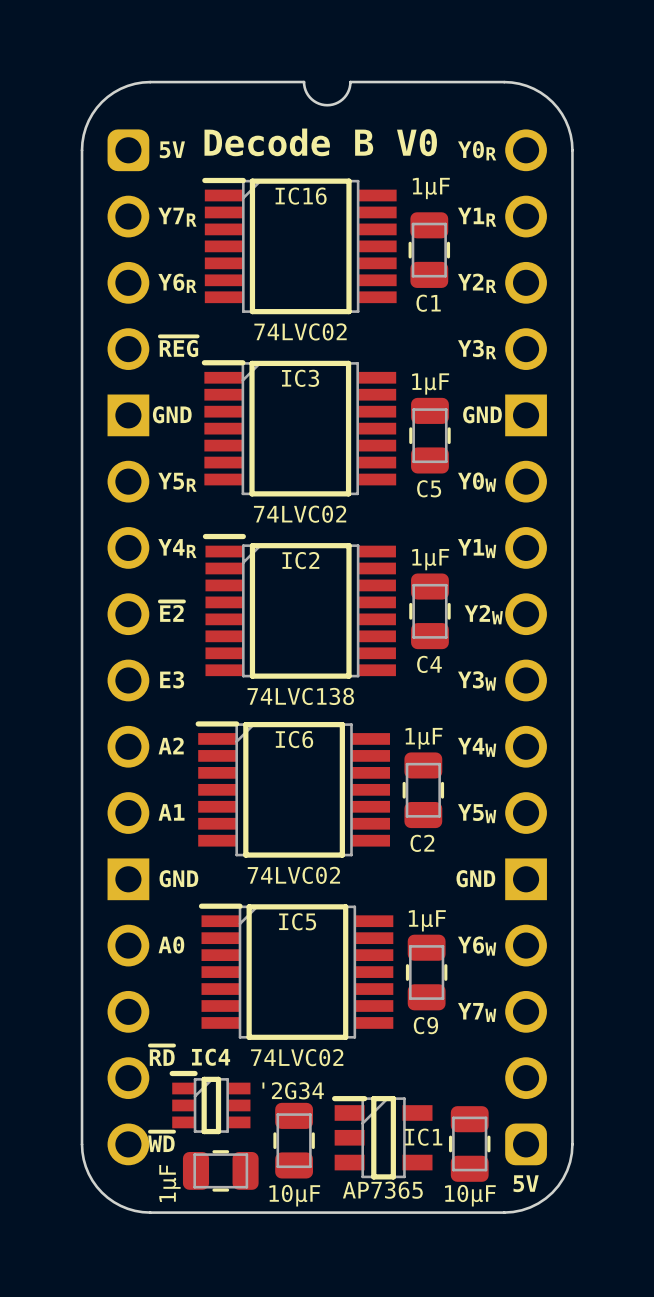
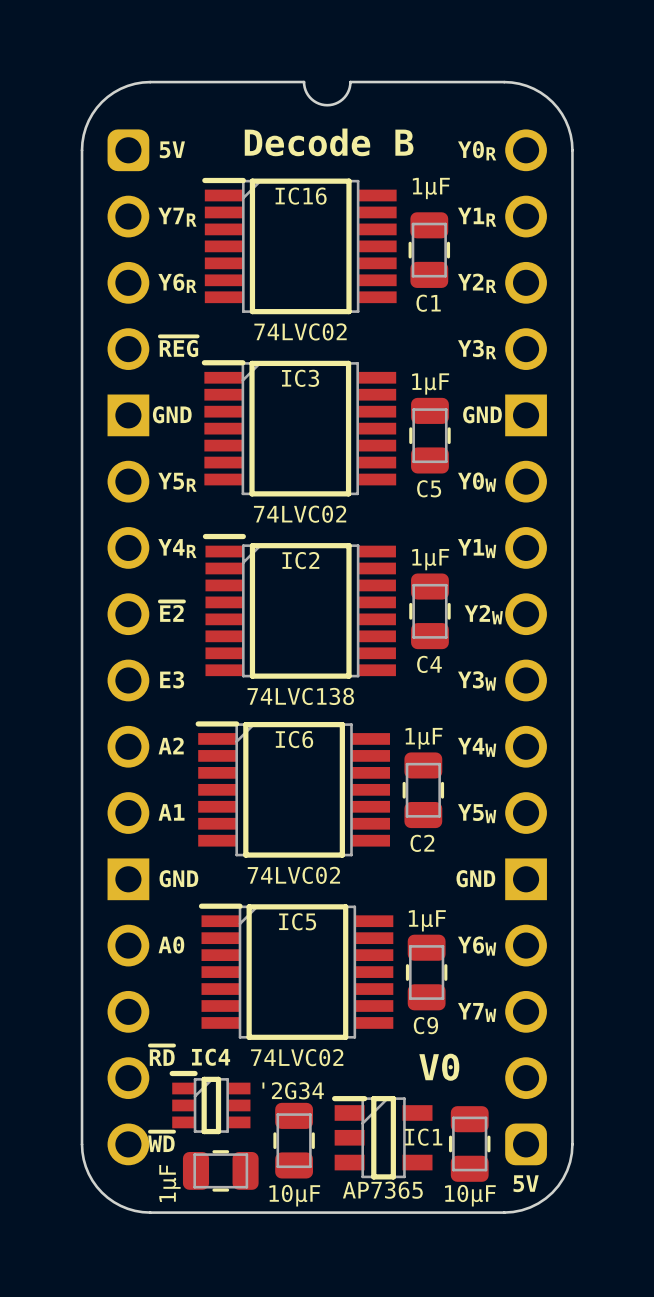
text: Decode B V0 (320, 142) -> Decode B (329, 142)
text: none -> V0 (439, 1067)

